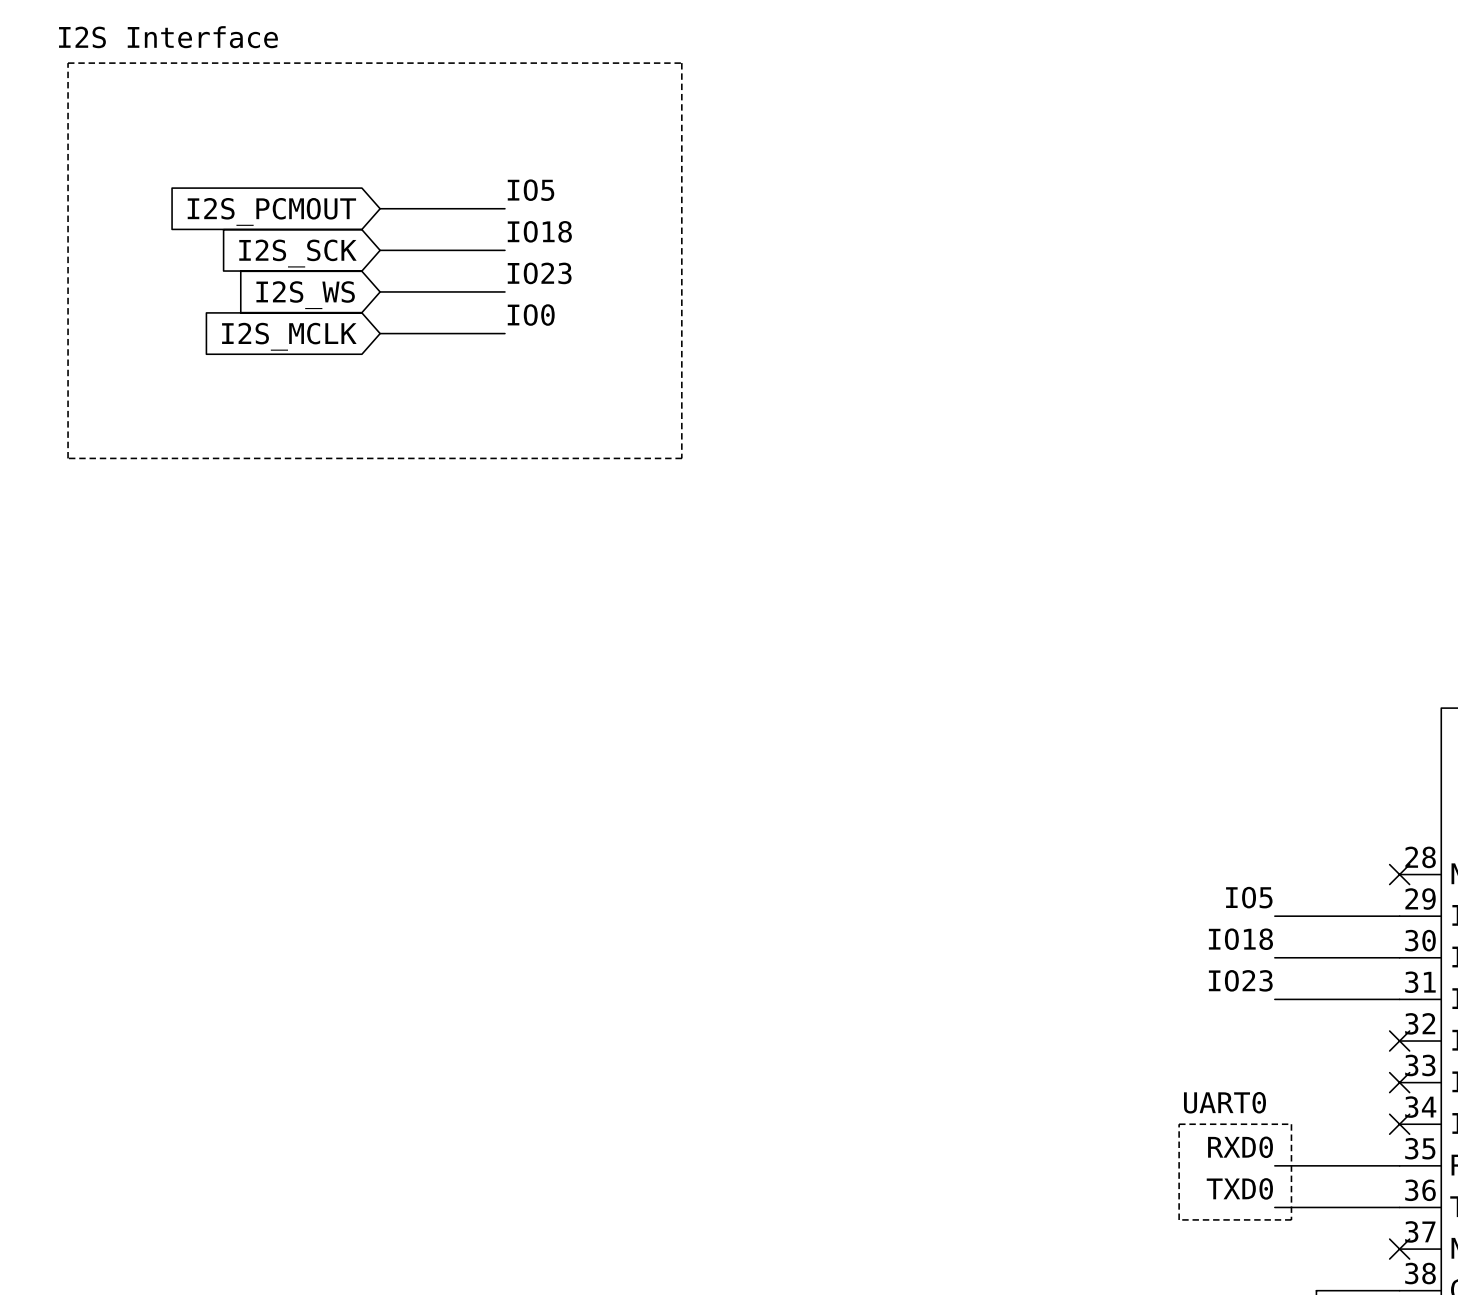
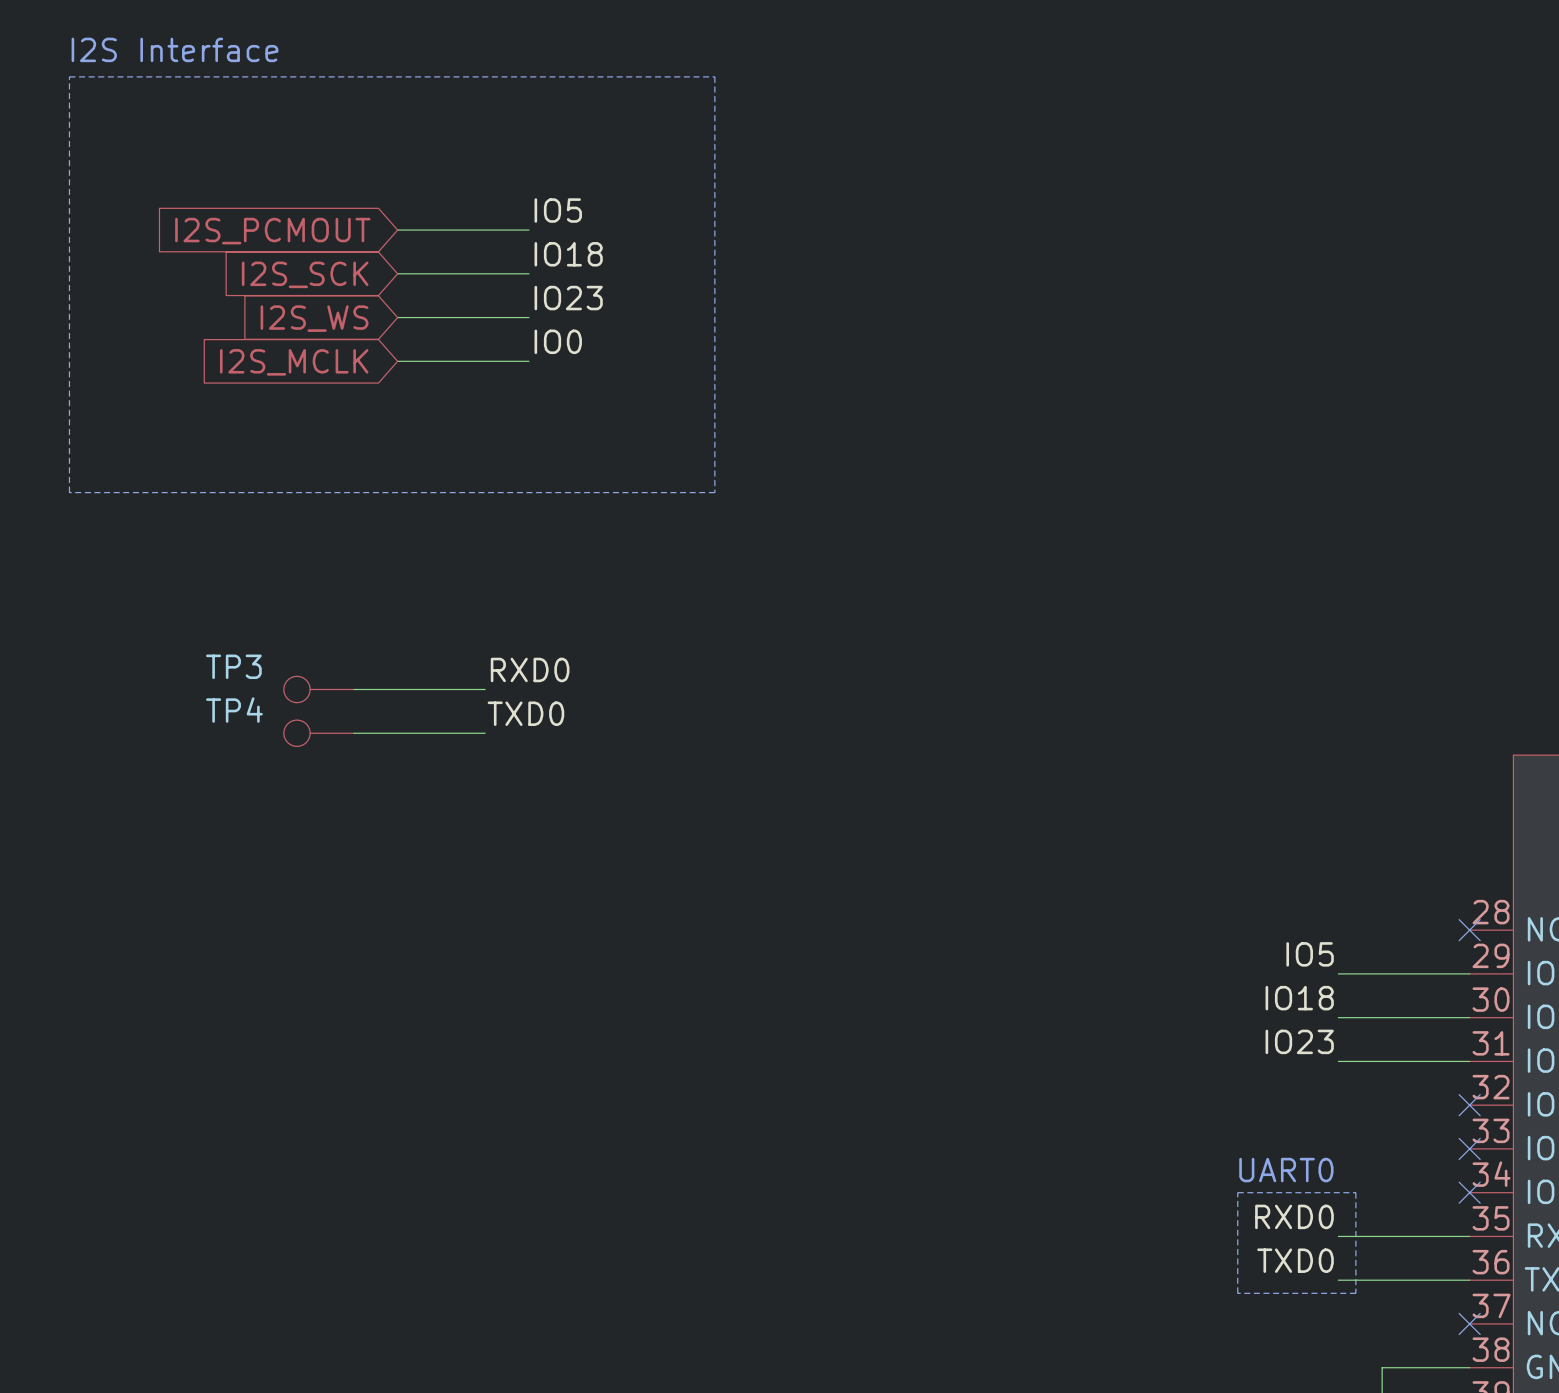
label: none -> RXD0 (530, 669)
TP3: none -> (318, 689)
wire: none -> (353, 689) (485, 689)
label: none -> TXD0 (525, 713)
TP4: none -> (318, 733)
wire: none -> (353, 733) (485, 733)

